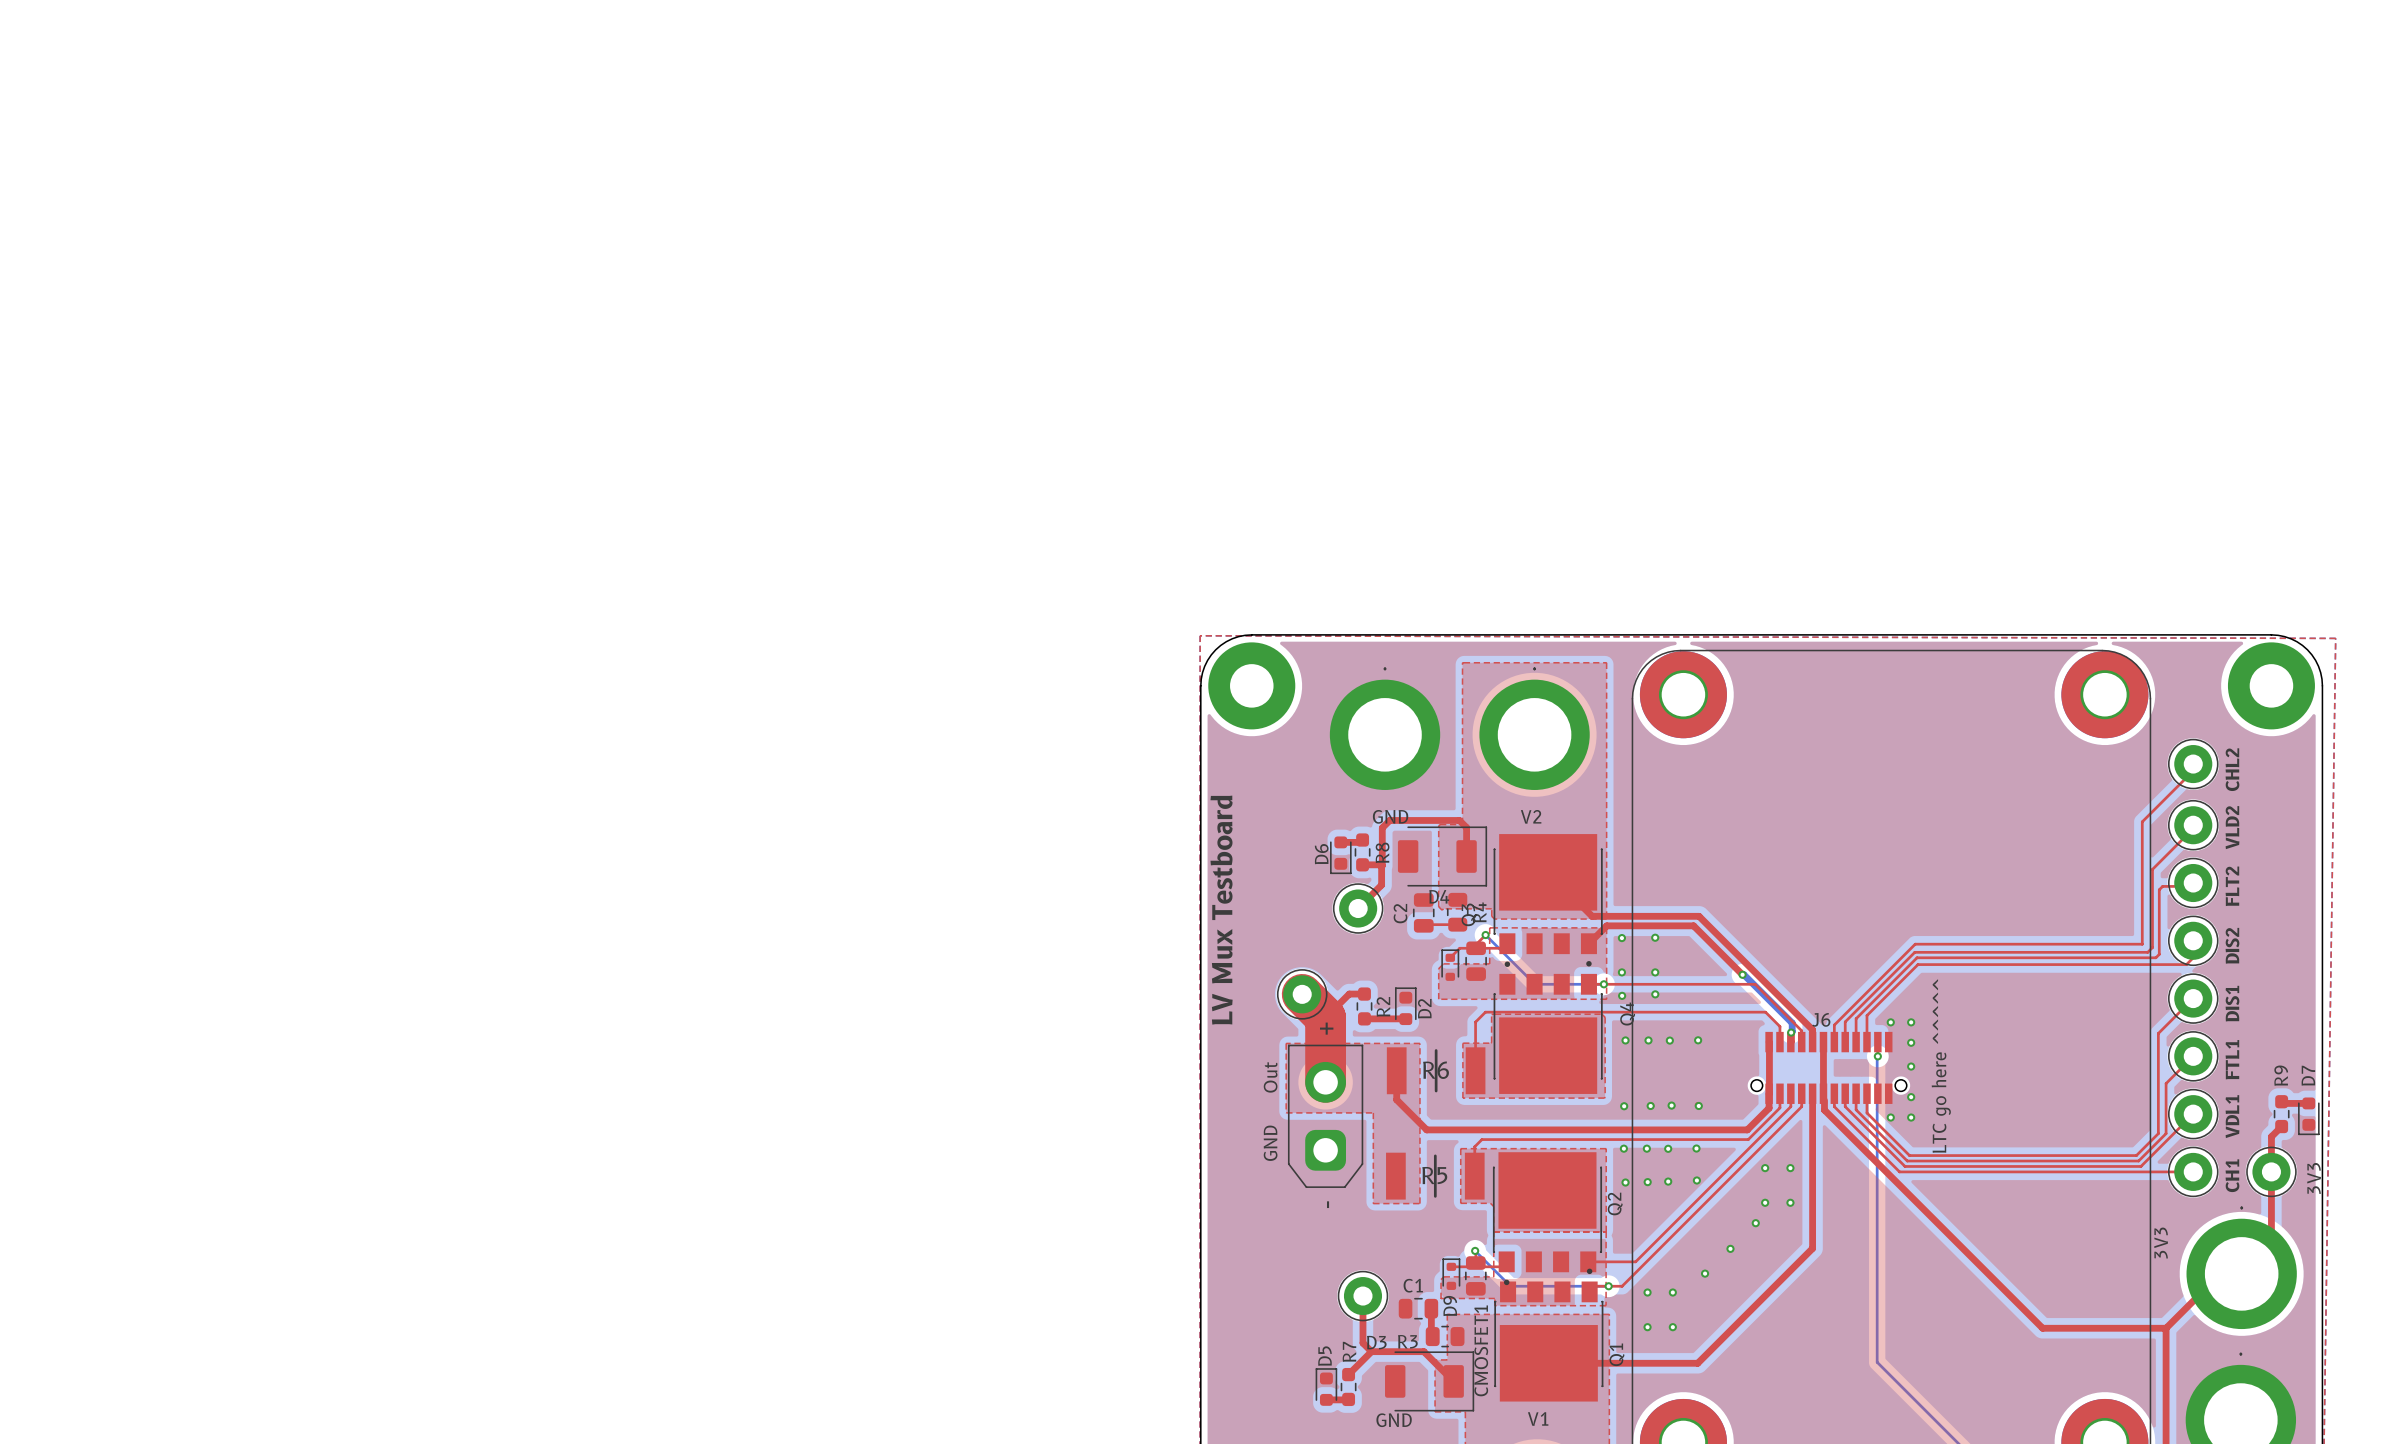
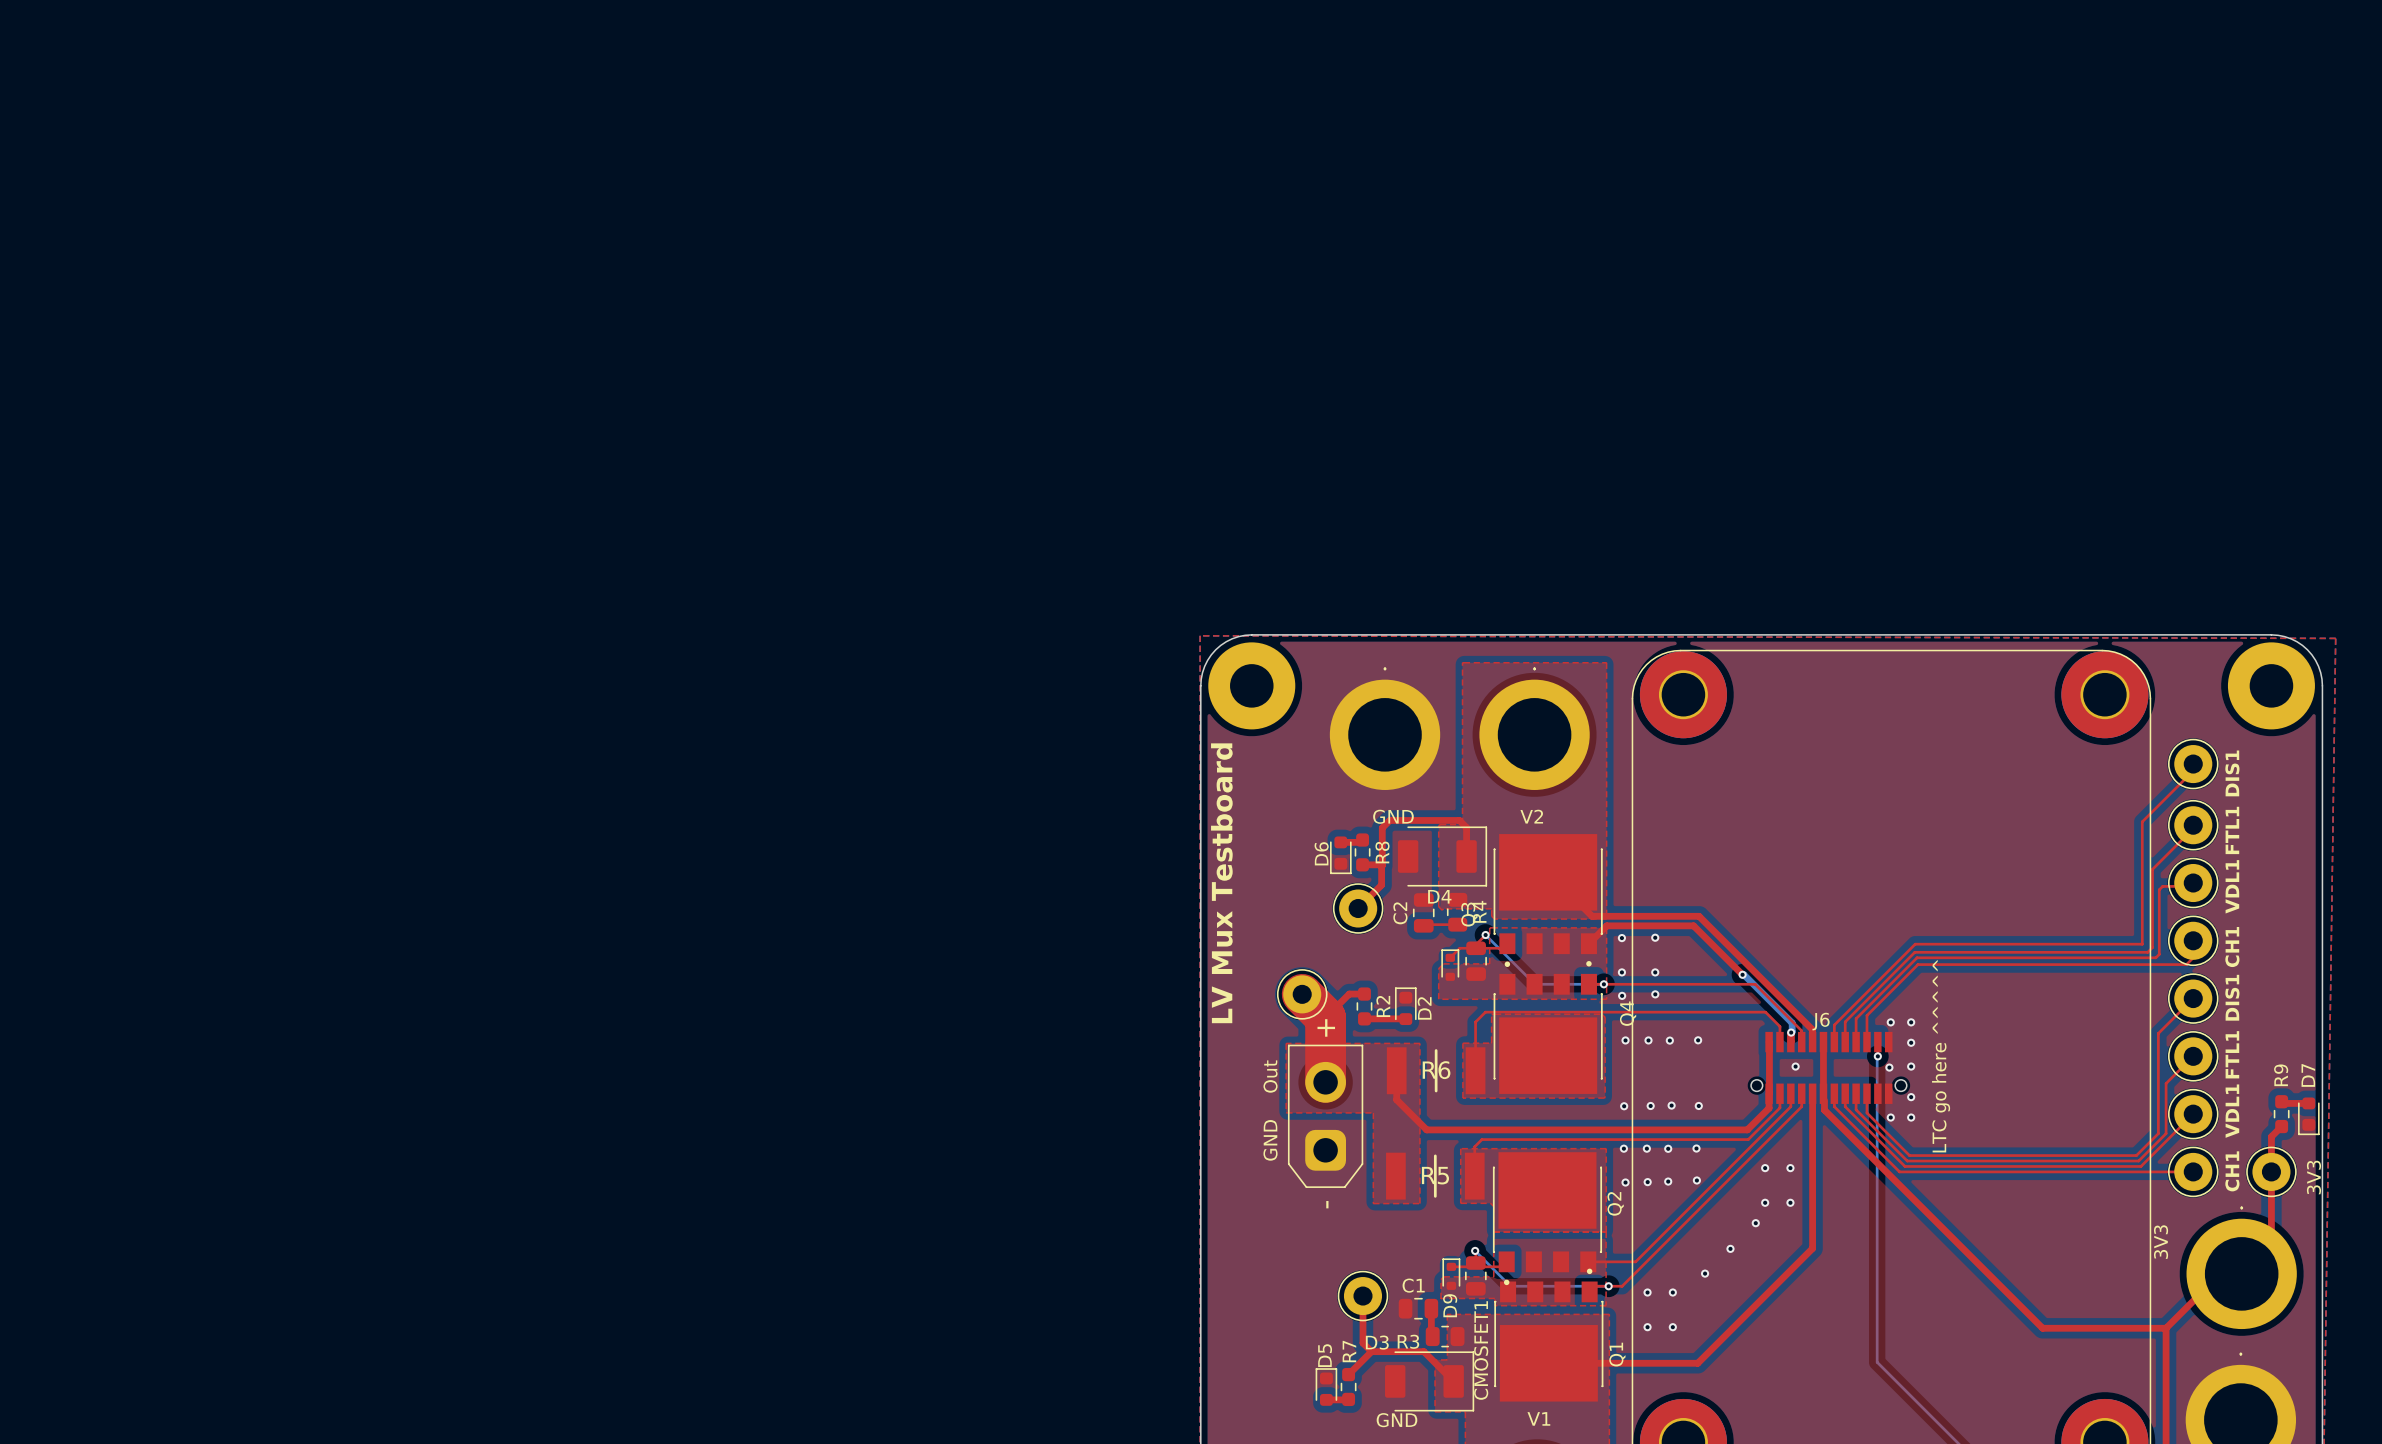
text: CHL2 (2232, 769) -> DIS1 (2232, 773)
text: VLD2 (2232, 827) -> FTL1 (2232, 830)
text: FLT2 (2232, 886) -> VDL1 (2232, 886)
text: DIS2 (2232, 945) -> CH1 (2232, 947)
via: none -> (1795, 1066)
via: none -> (1889, 1067)

